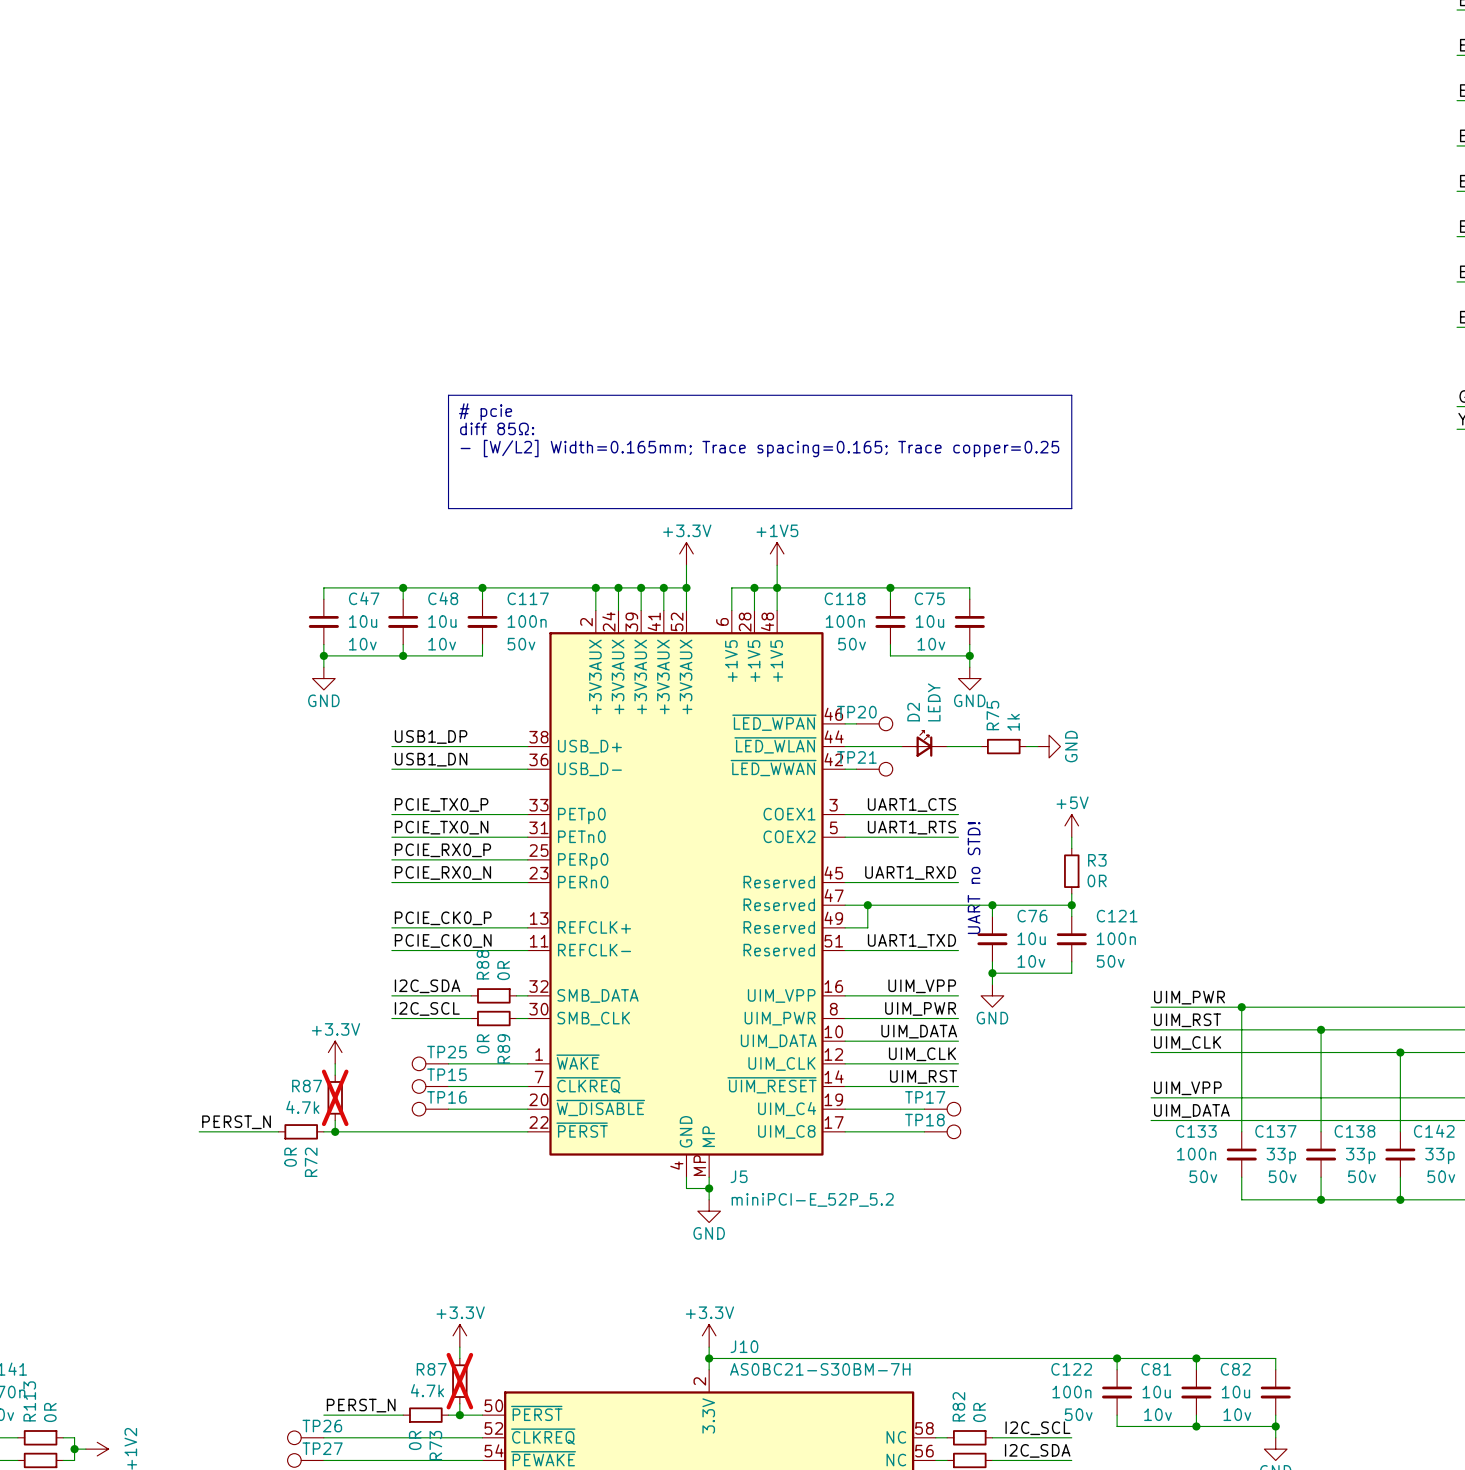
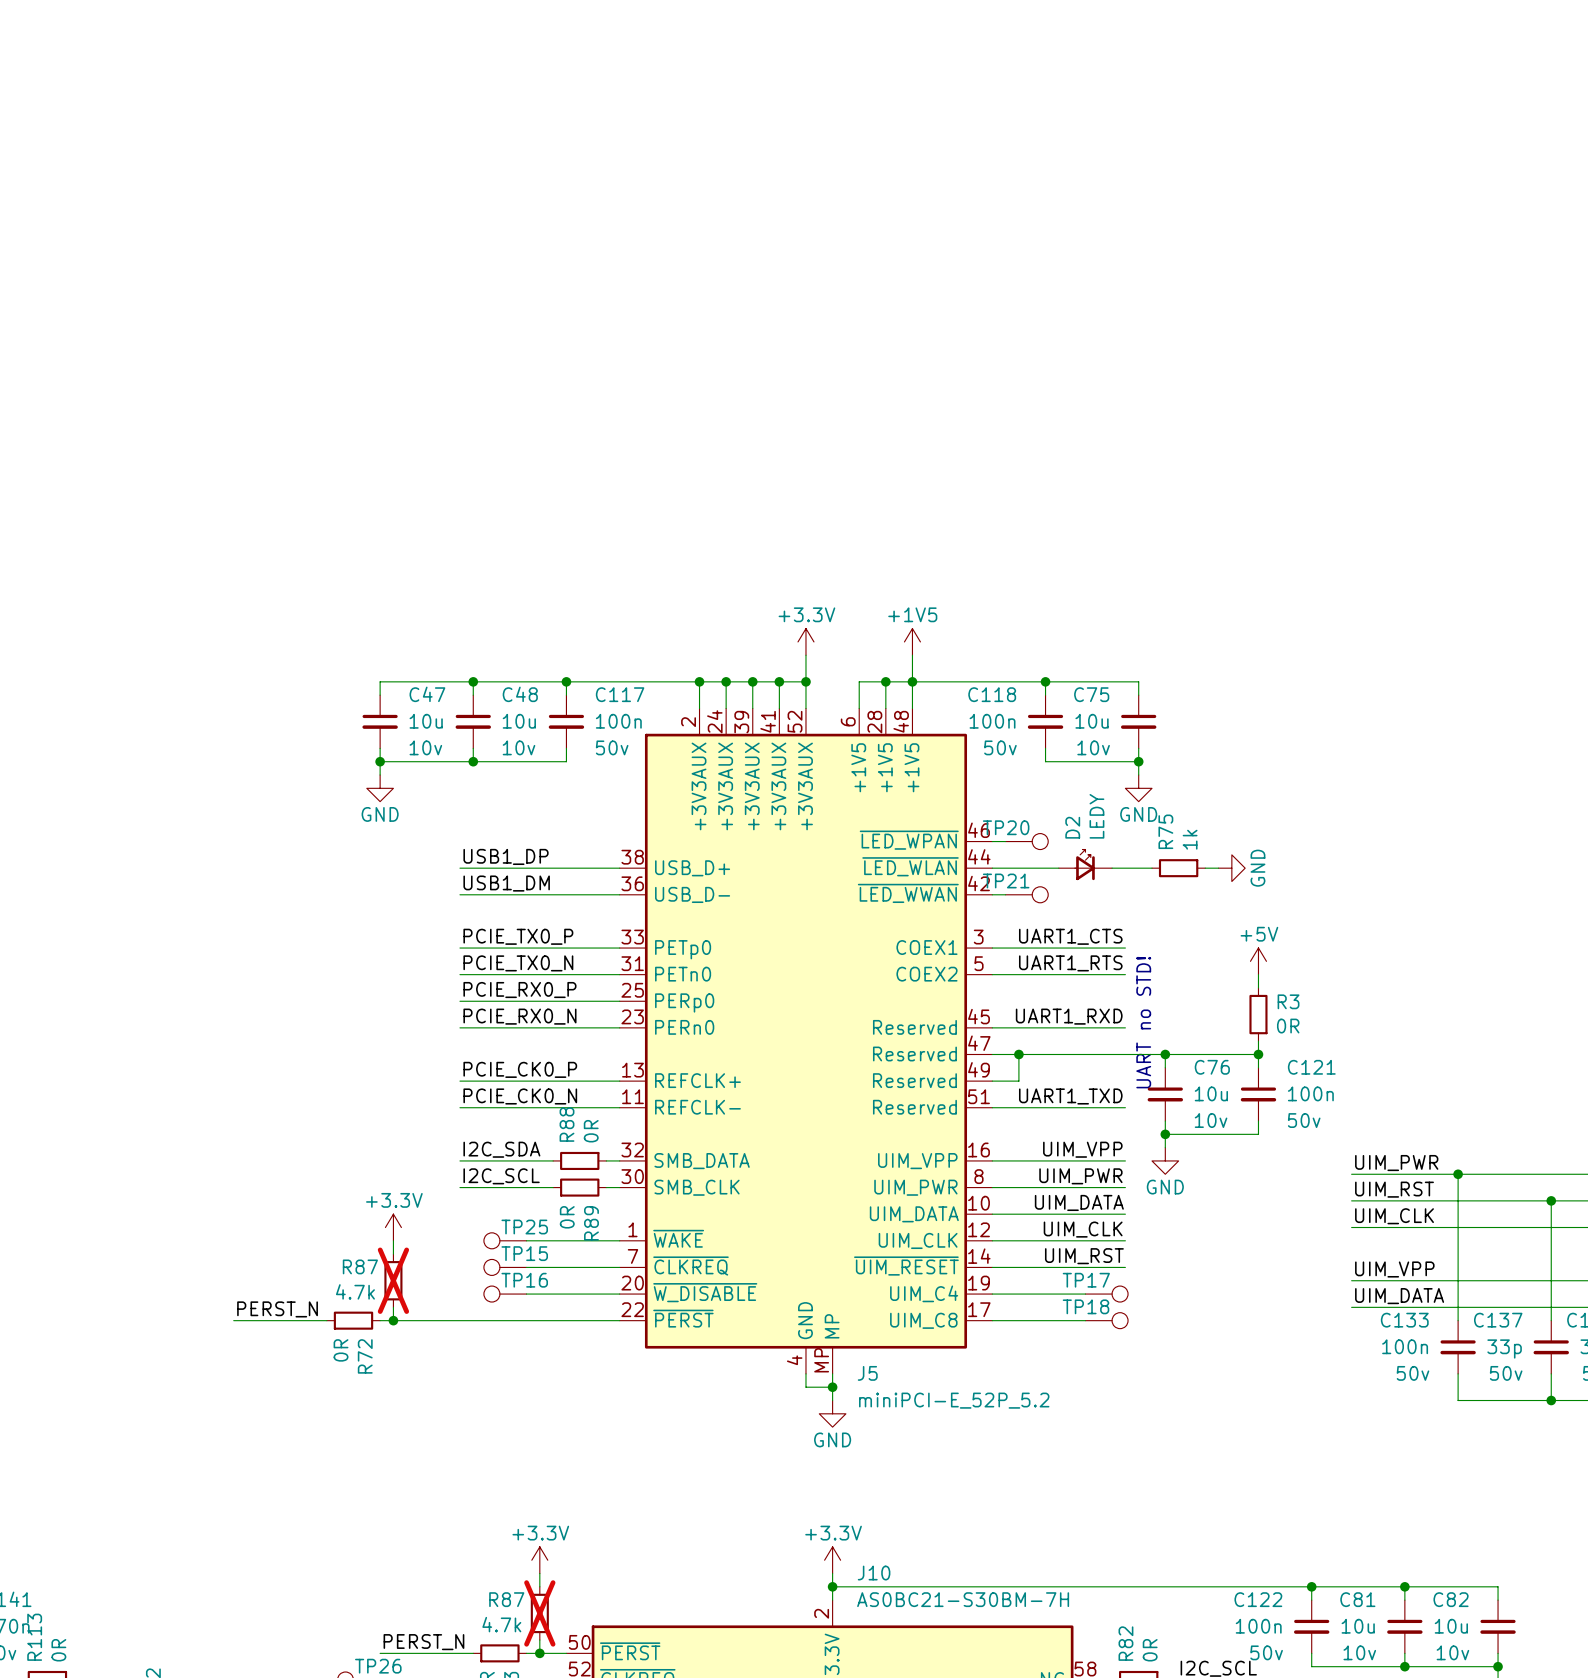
line: (448, 395) (1071, 395) (1071, 508) (448, 508) (448, 395) -> none
text: # pcie (485, 412) -> none
text: diff 85Ω: (497, 428) -> none
text: - [W/L2] Width=0.165mm; Trace spacing=0.165; Trace copper=0.25 (759, 448) -> none
label: USB1_DN (431, 759) -> USB1_DM (506, 883)

